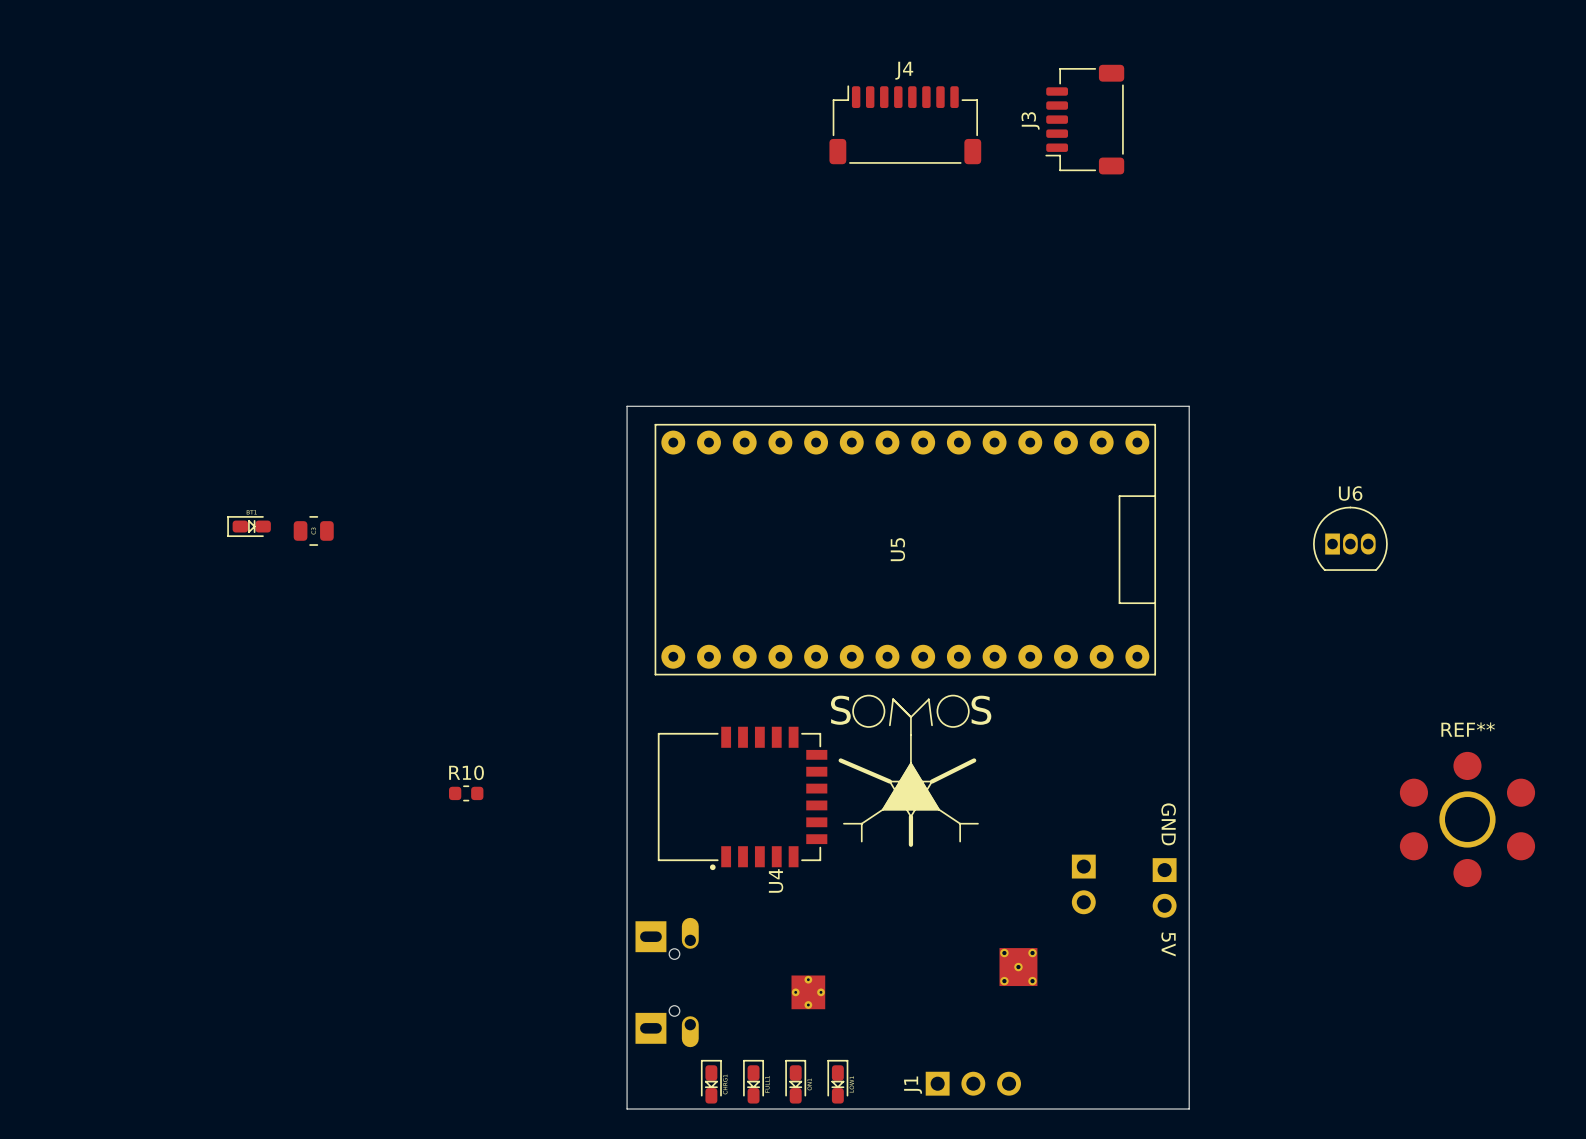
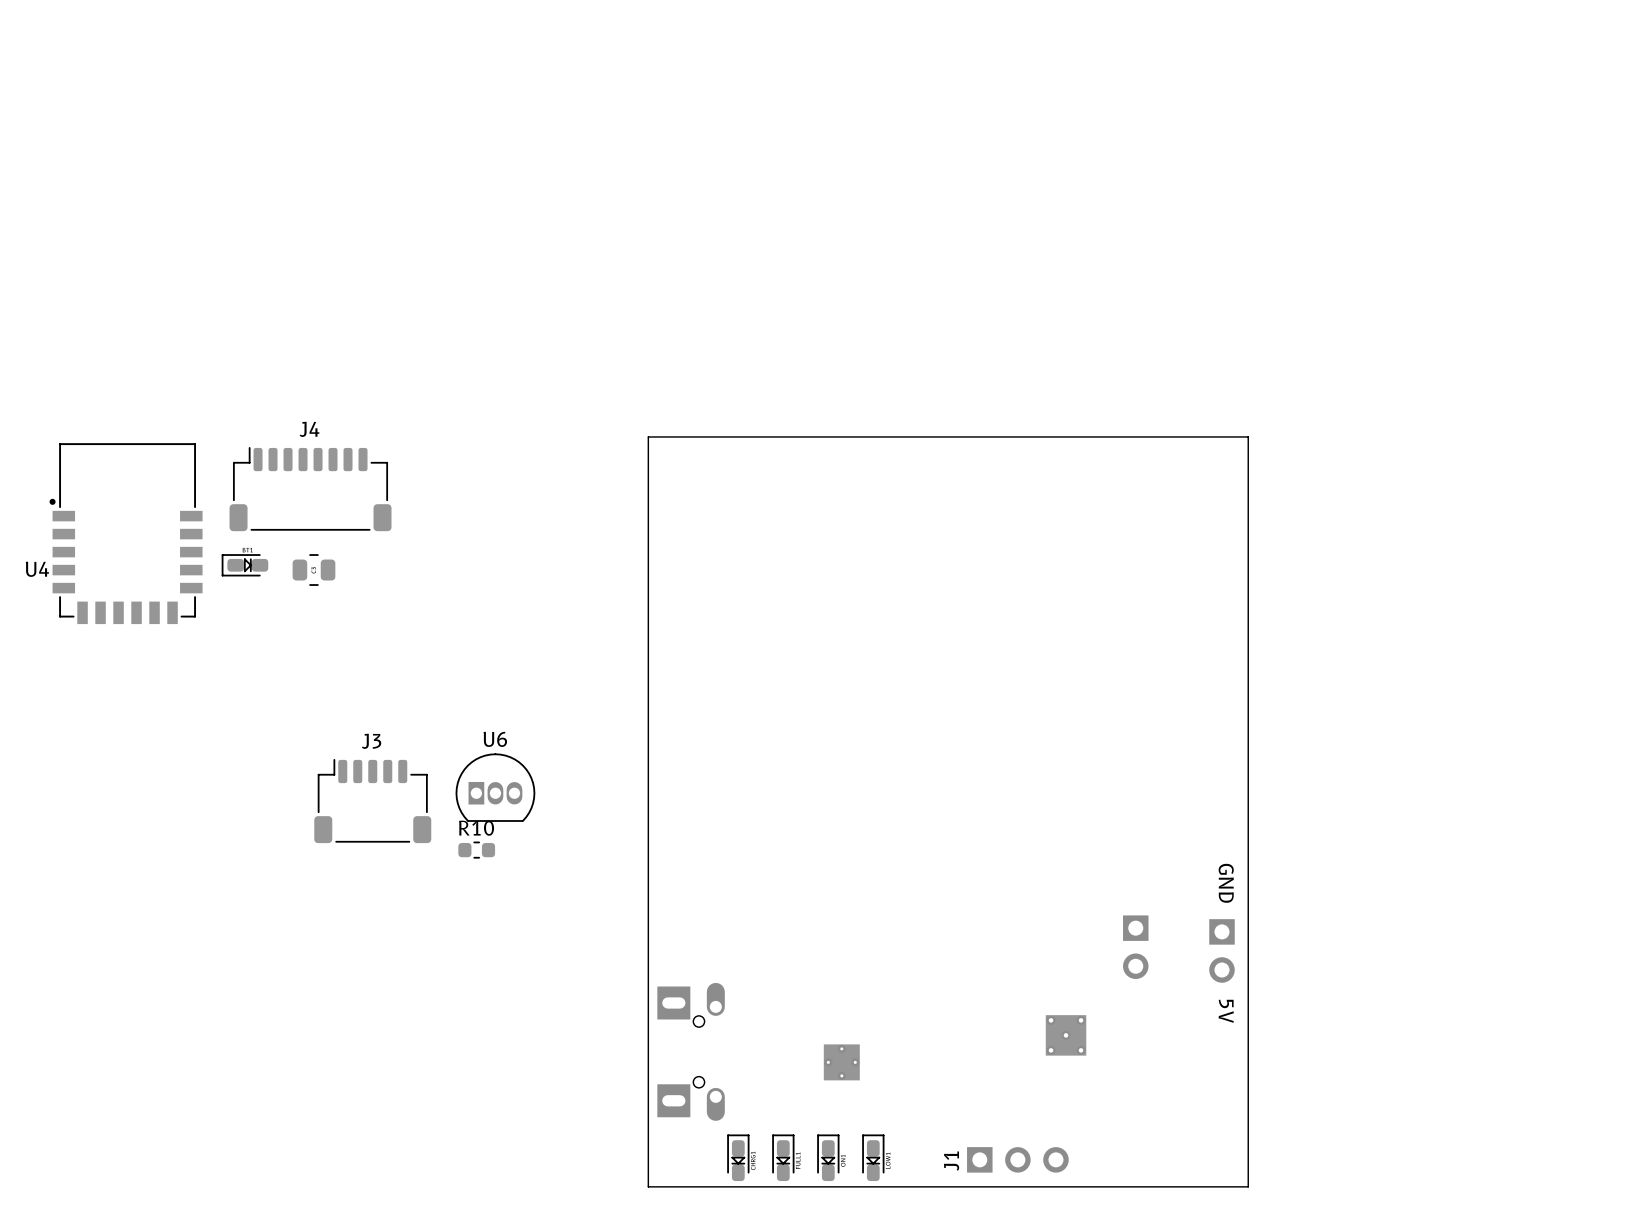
J3 rotation: 0° (1084, 119) -> 90° clockwise (372, 801)
J3 position: (1084, 119) -> (372, 801)
J4 position: (905, 124) -> (310, 489)
U6 position: (1350, 538) -> (495, 787)
U5: (905, 549) -> none
drawing: [838, 694, 979, 847] -> none
U4 rotation: 0° (742, 798) -> 90° clockwise (126, 533)
U4 position: (742, 798) -> (126, 533)
REF**: (1467, 819) -> none

